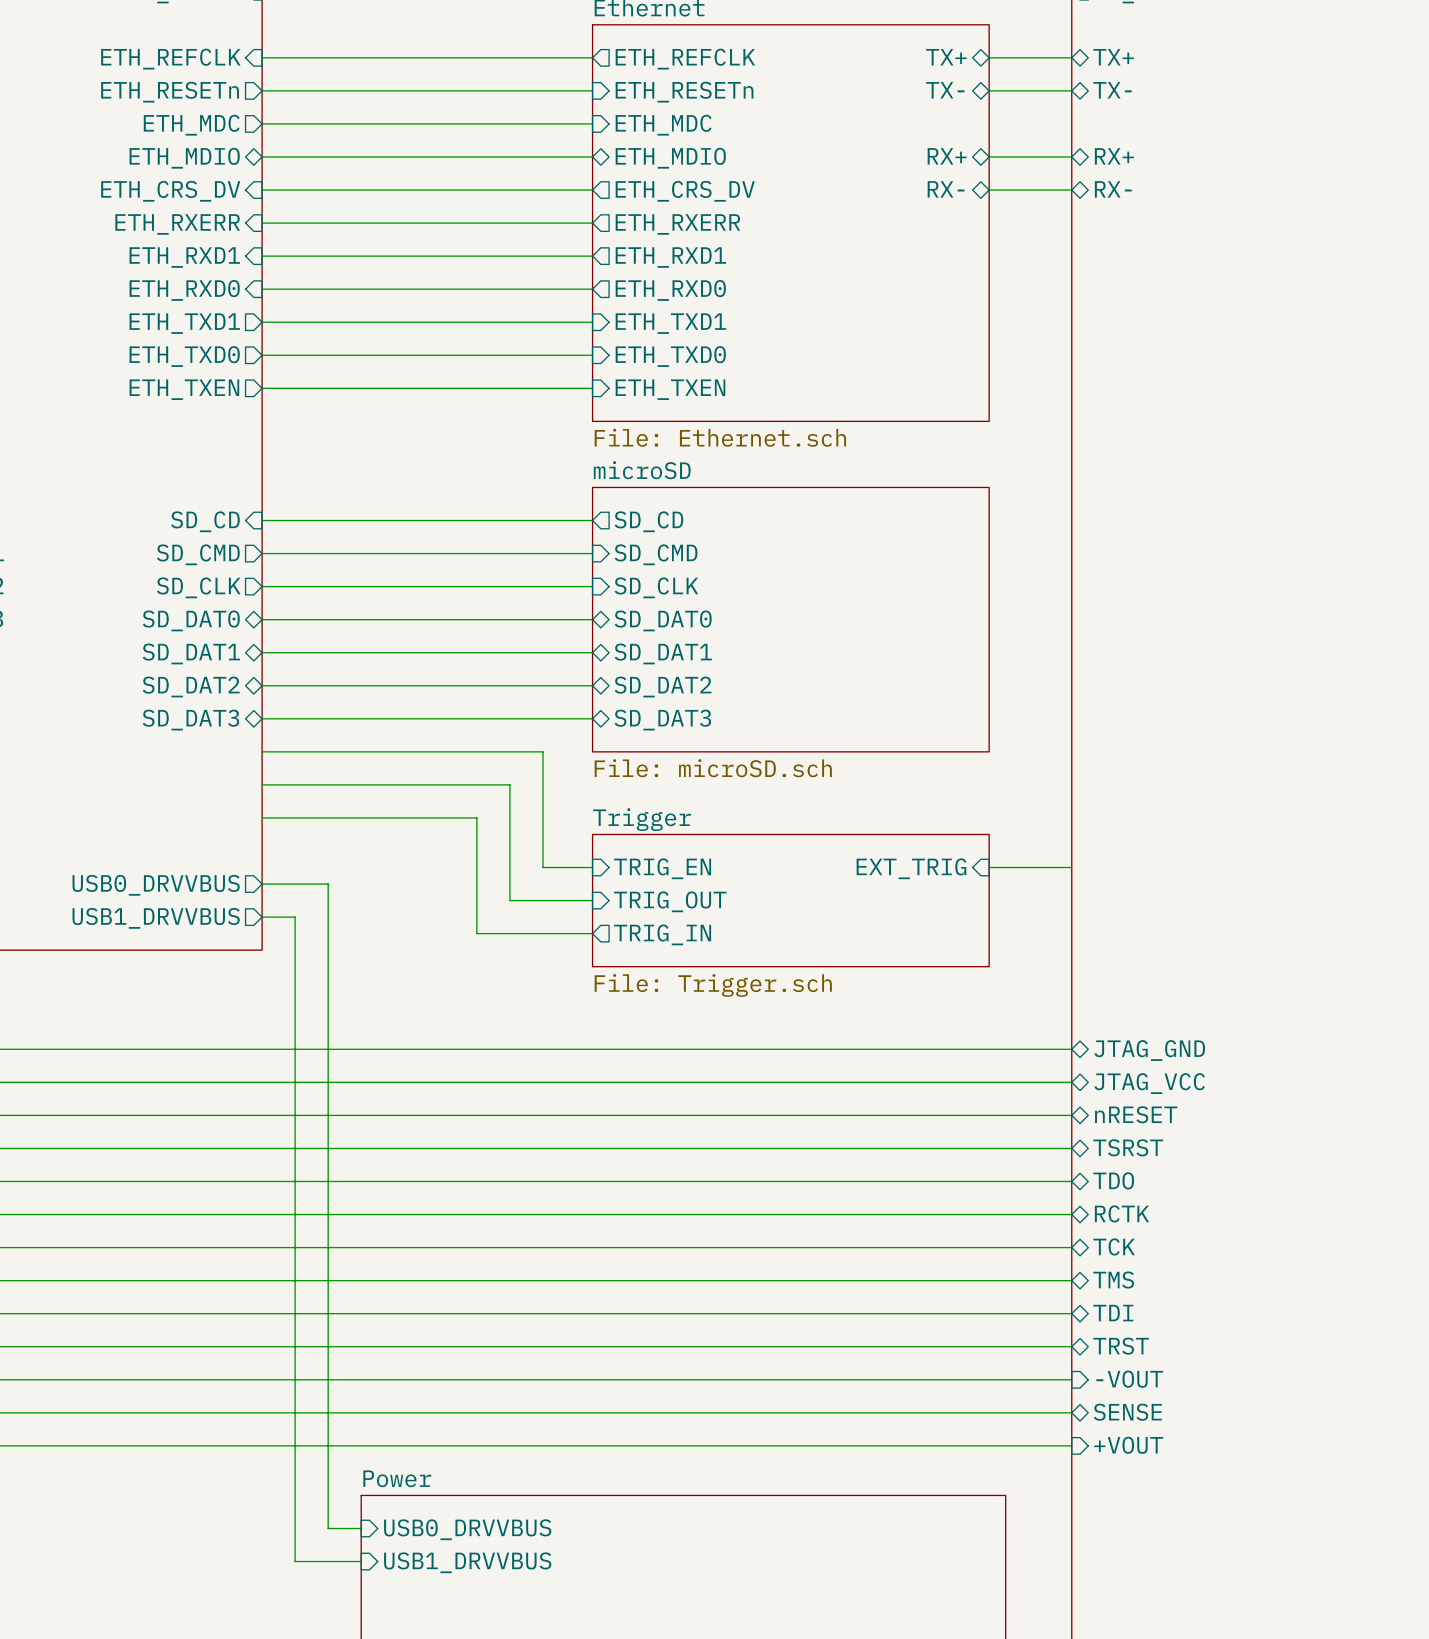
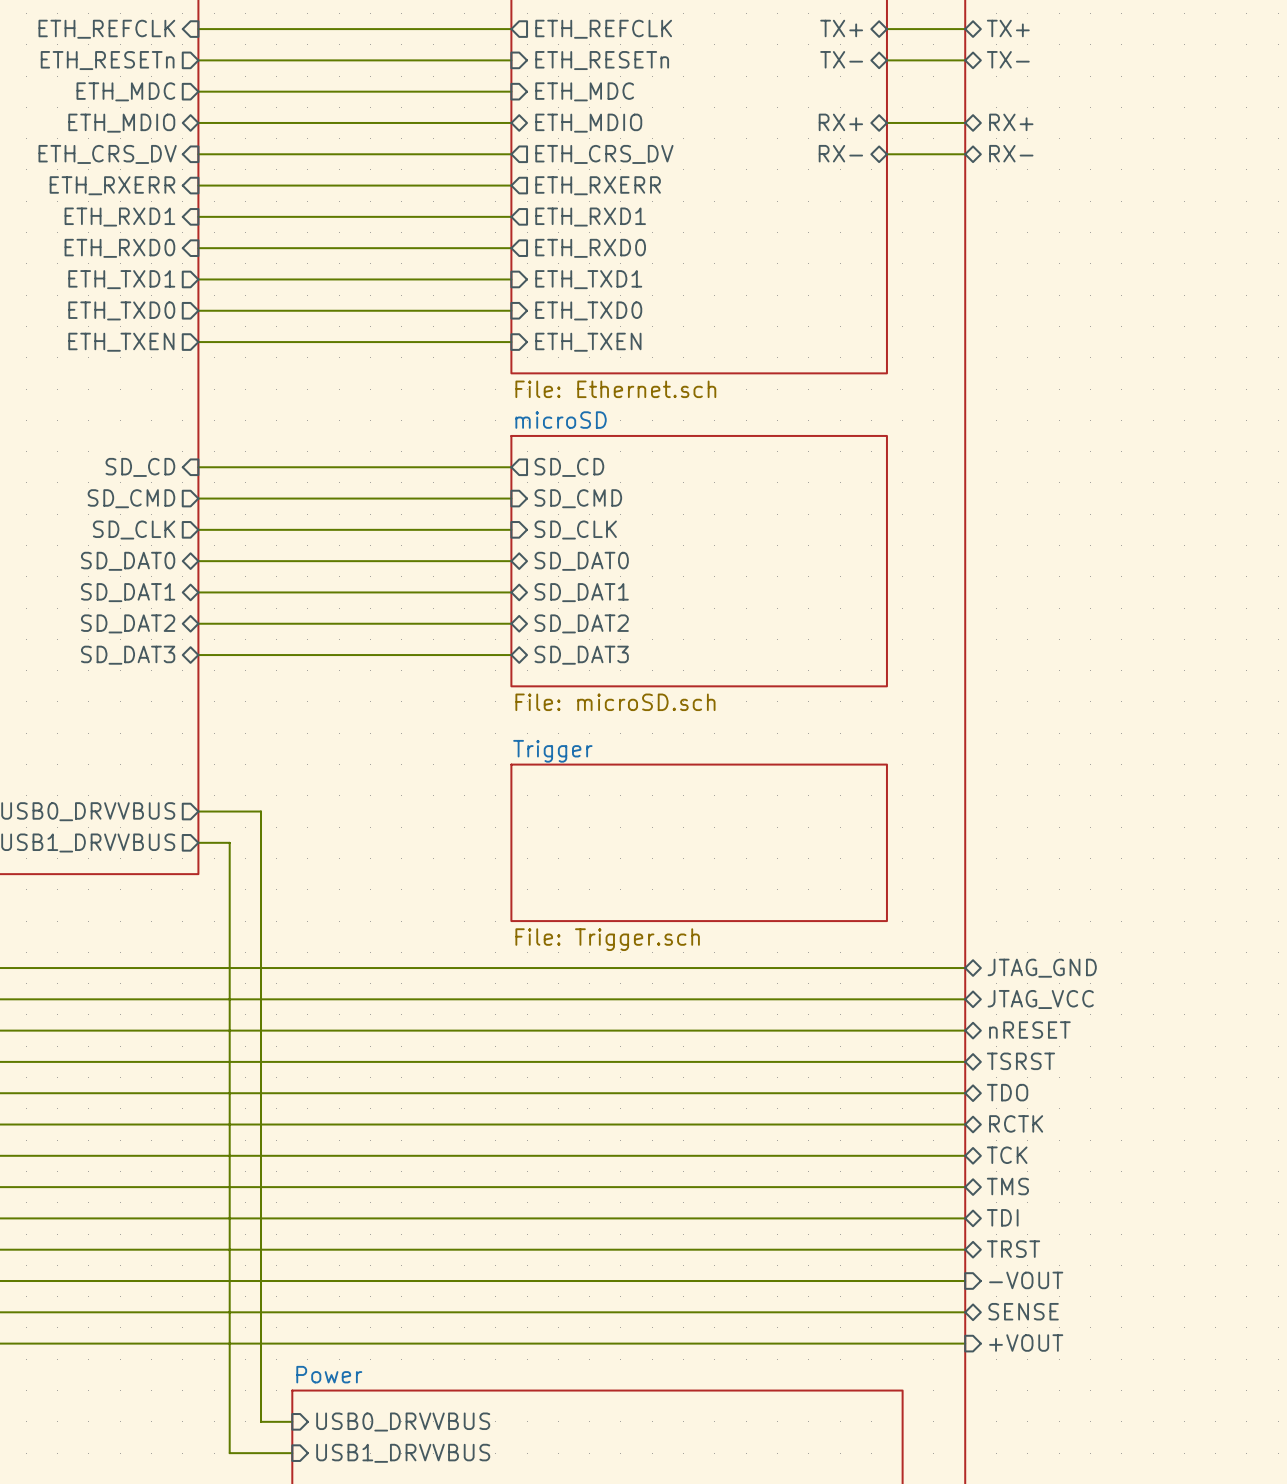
wire: (262, 751) (542, 751) (542, 867) (592, 867) -> none
wire: (262, 784) (509, 784) (509, 900) (592, 900) -> none
wire: (262, 817) (476, 817) (476, 933) (592, 933) -> none
wire: (989, 867) (1071, 867) -> none
sheet pin: TRIG_EN (662, 868) -> none
sheet pin: EXT_TRIG (911, 868) -> none
sheet Trigger: File: Trigger.sch (790, 900) -> none
sheet pin: TRIG_OUT (670, 901) -> none
sheet Trigger: none -> File: Trigger.sch (699, 842)
sheet pin: TRIG_IN (662, 934) -> none

